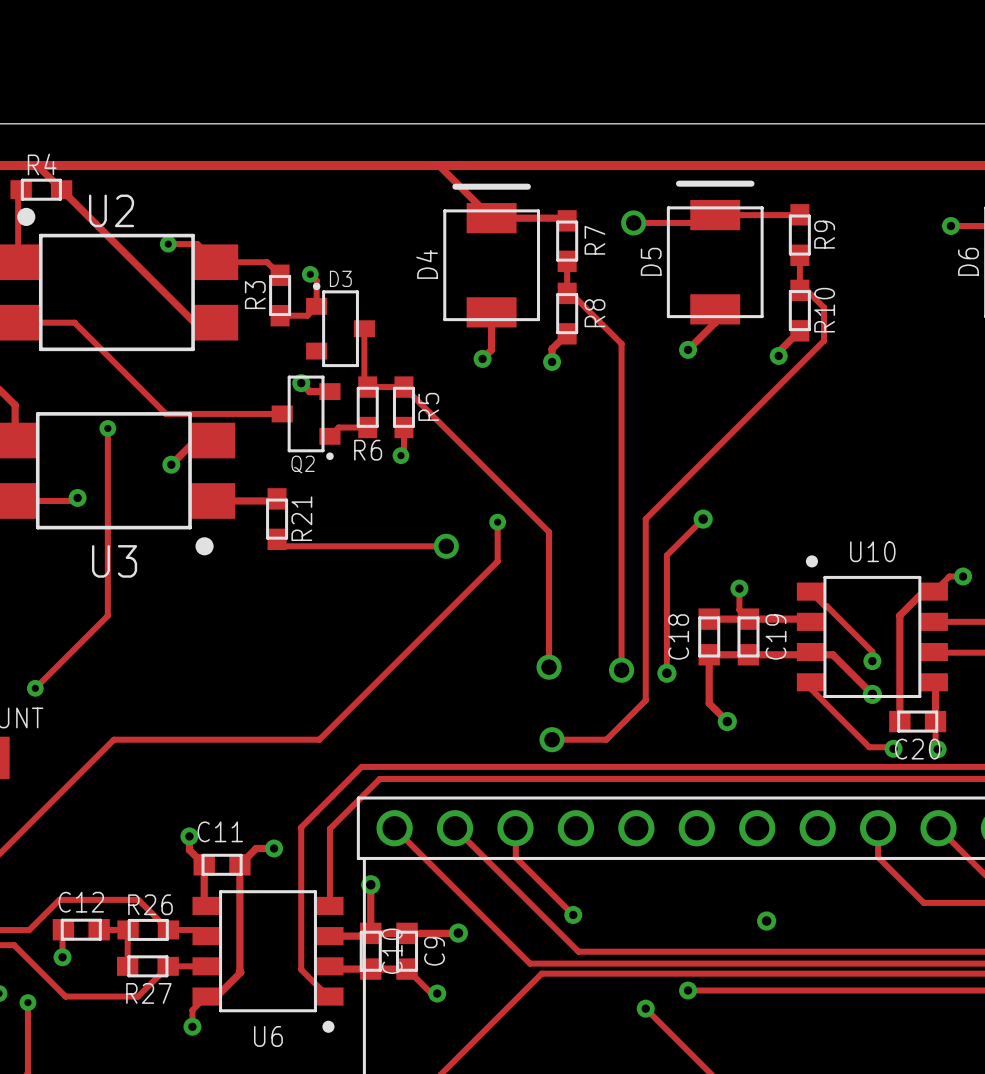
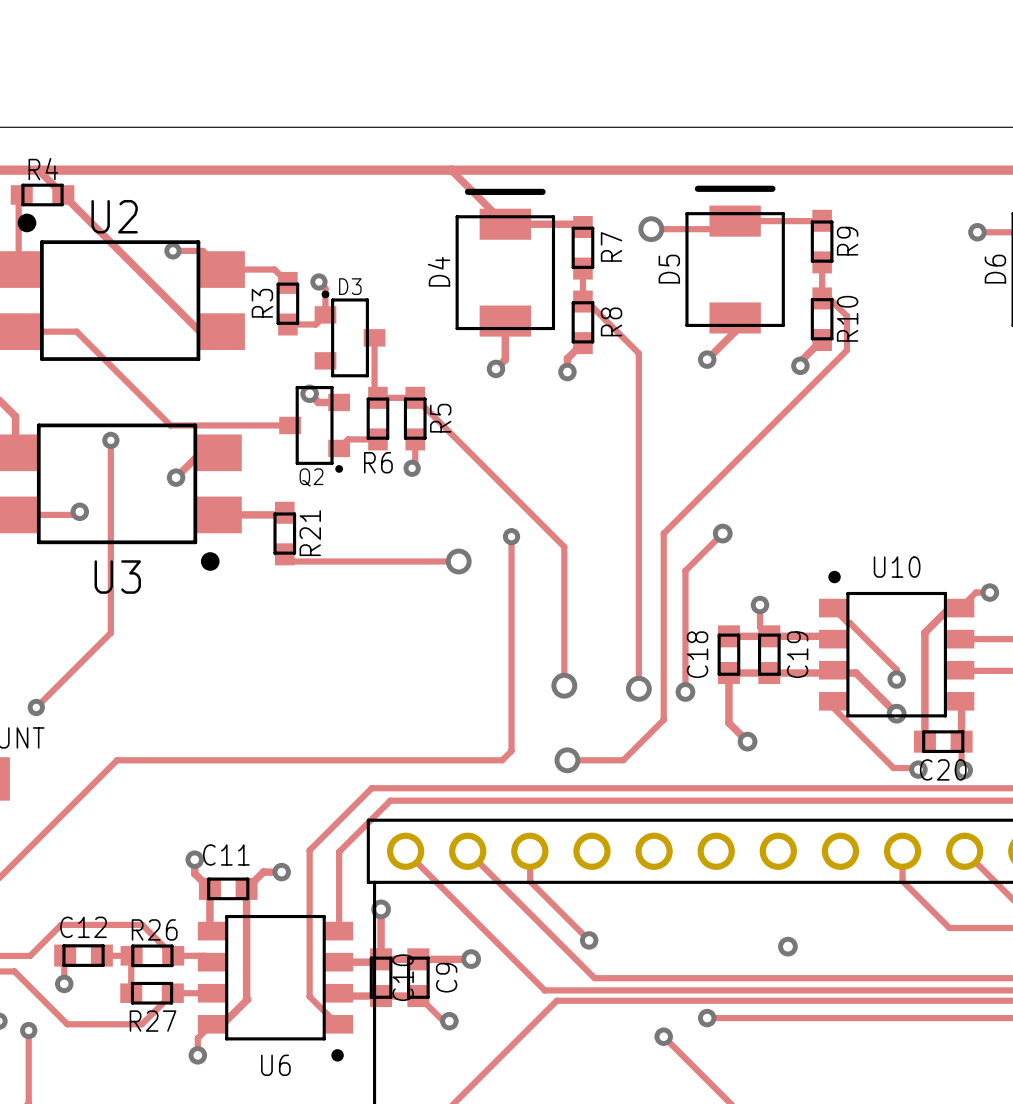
track: (497, 561) (319, 739) -> (511, 577) (511, 750) (502, 760) (328, 760)

